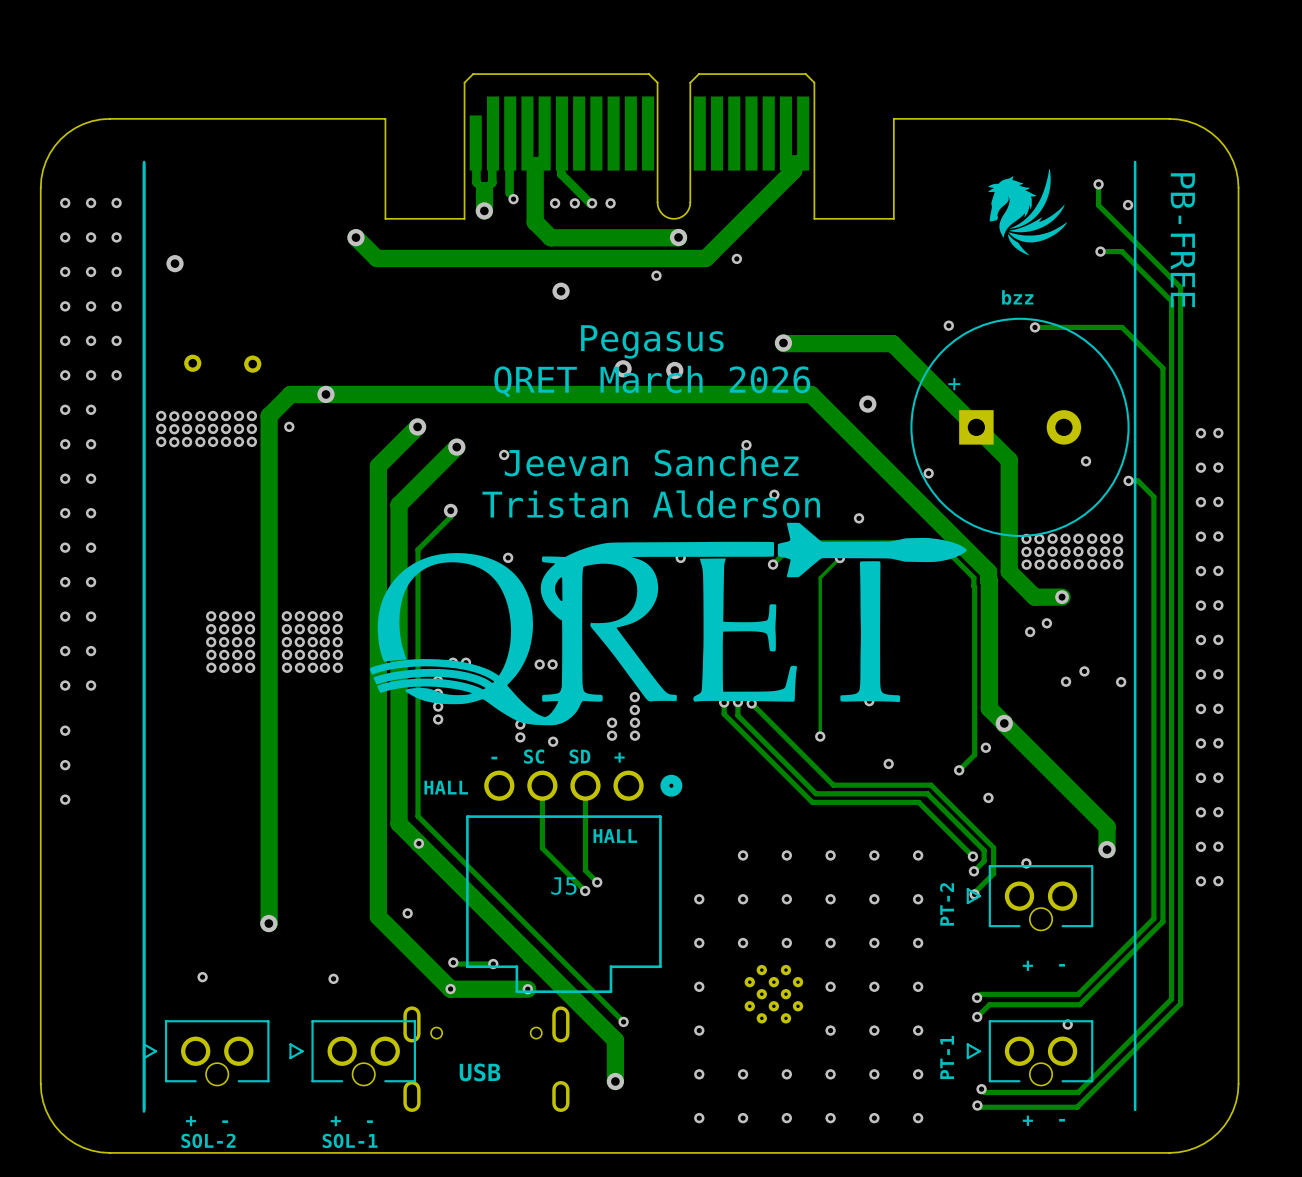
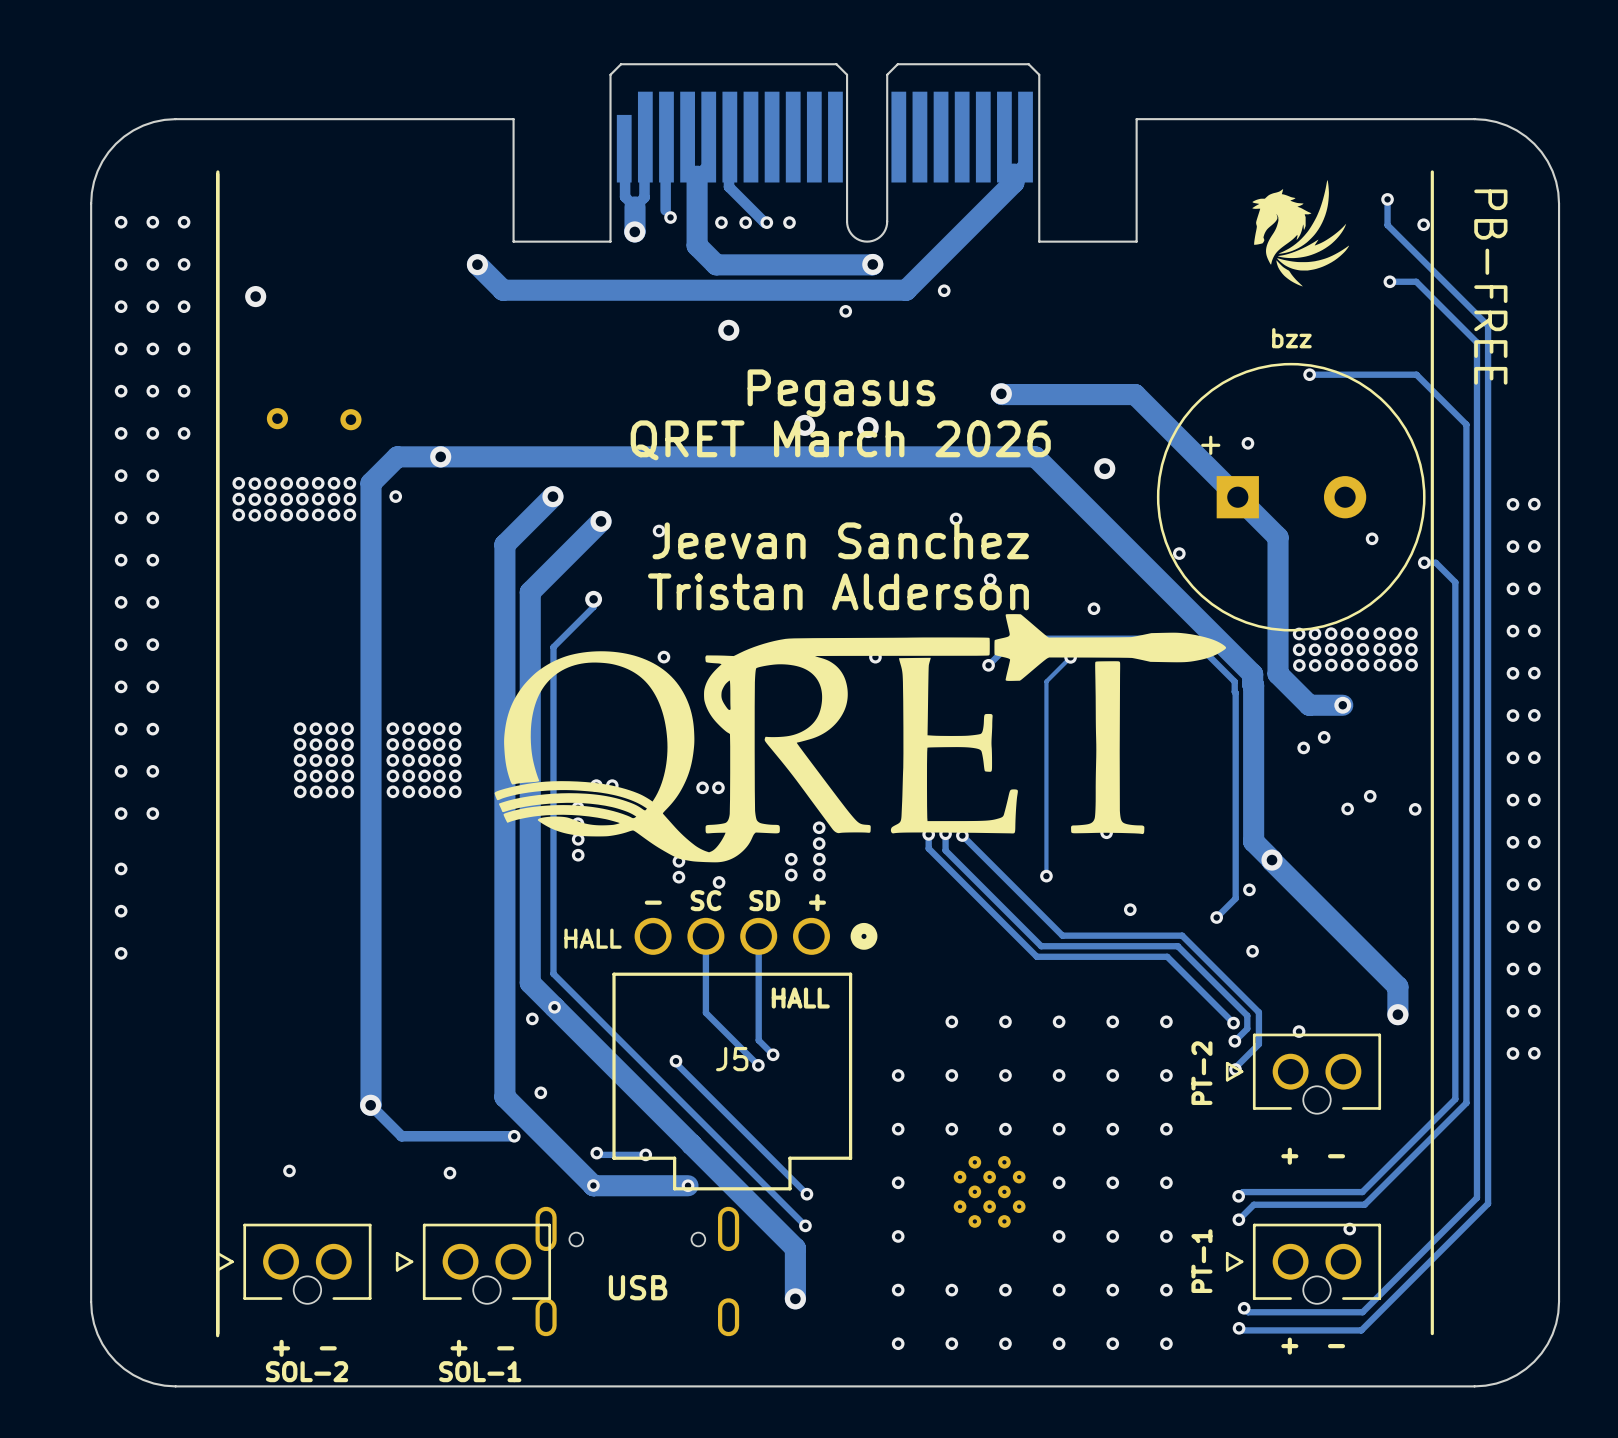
via position: (948, 325) -> (1247, 443)
via: none -> (532, 1018)
track: none -> (675, 1061) (806, 1194)
via: none -> (675, 1061)
track: none -> (370, 1105) (401, 1136) (514, 1136)
via: none -> (514, 1136)
via: none -> (806, 1194)

